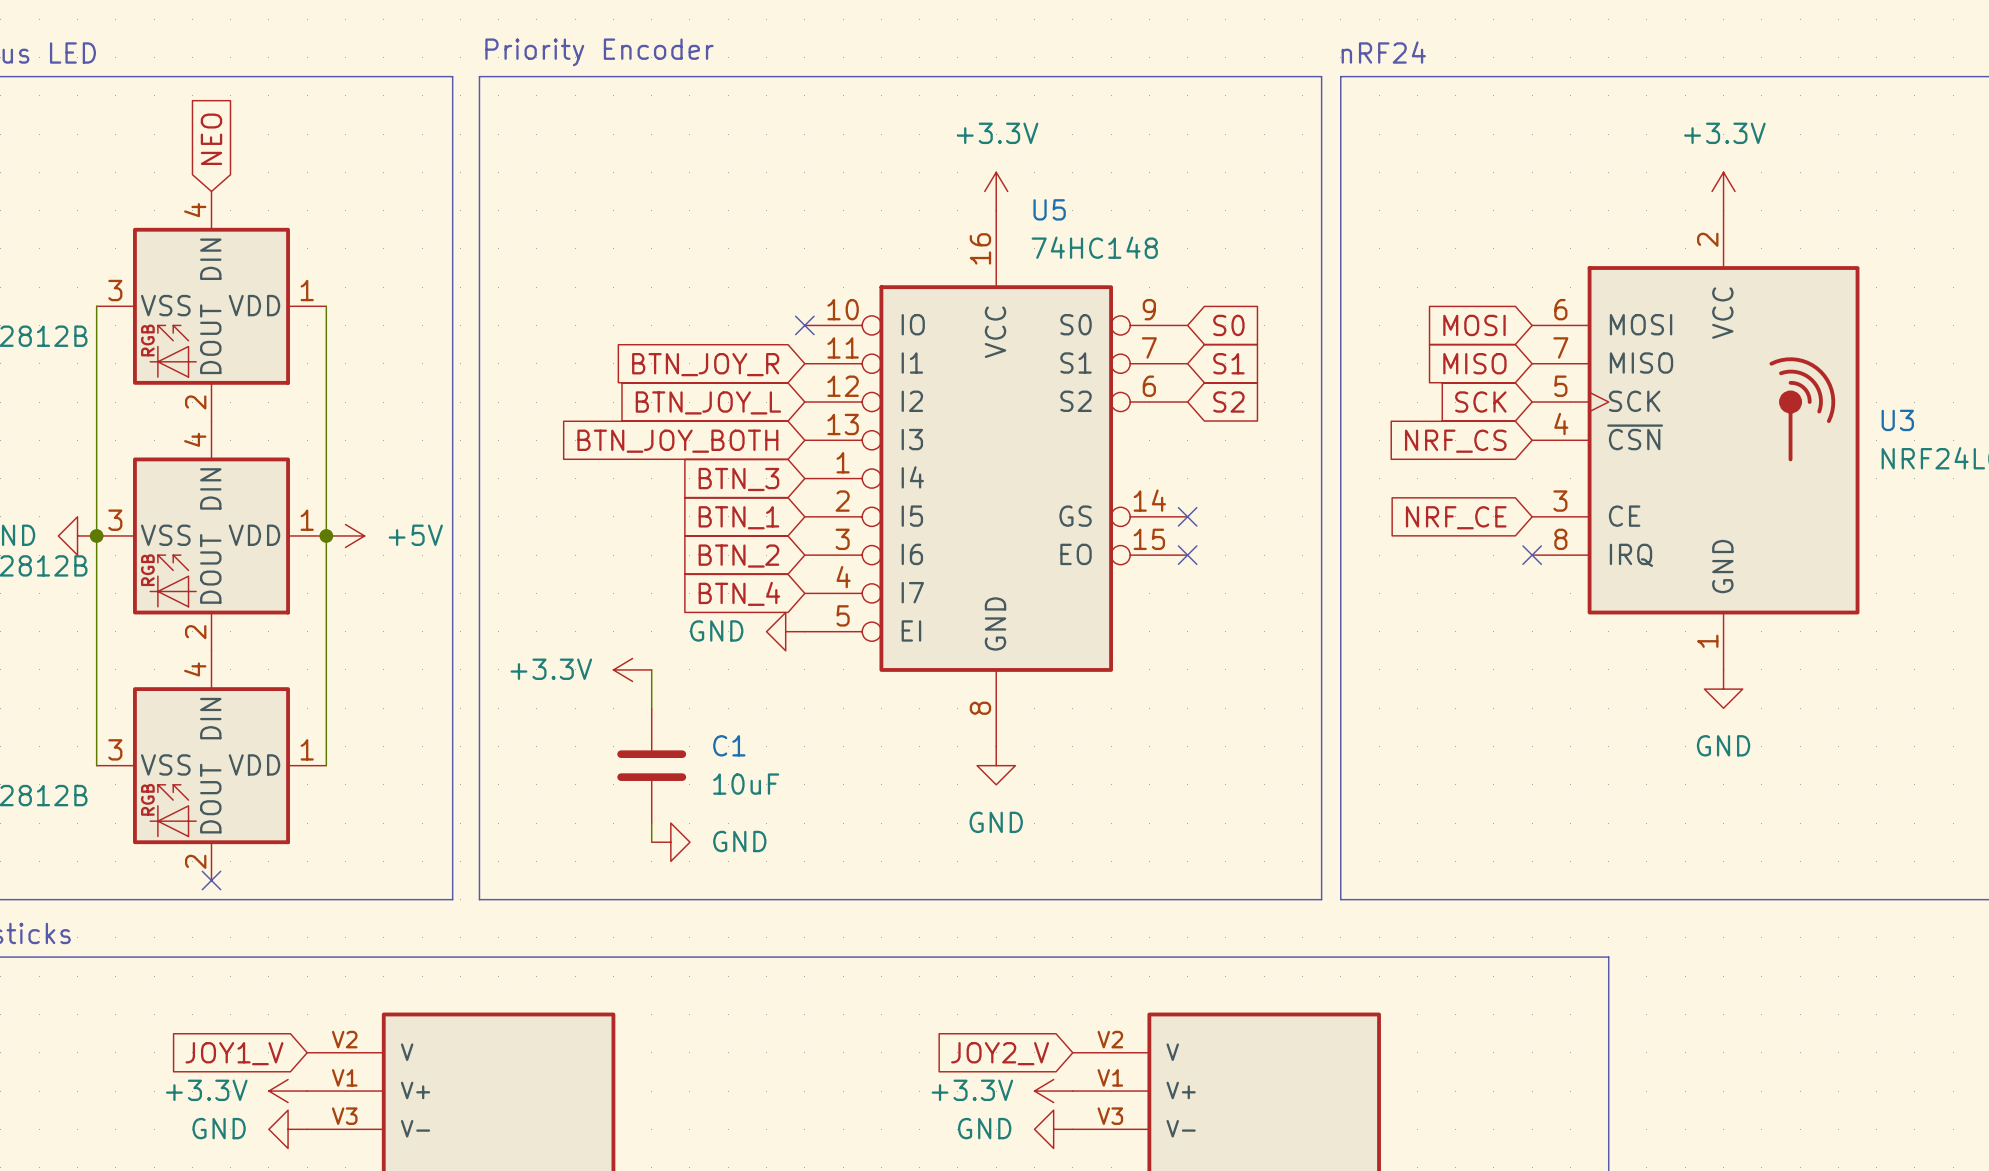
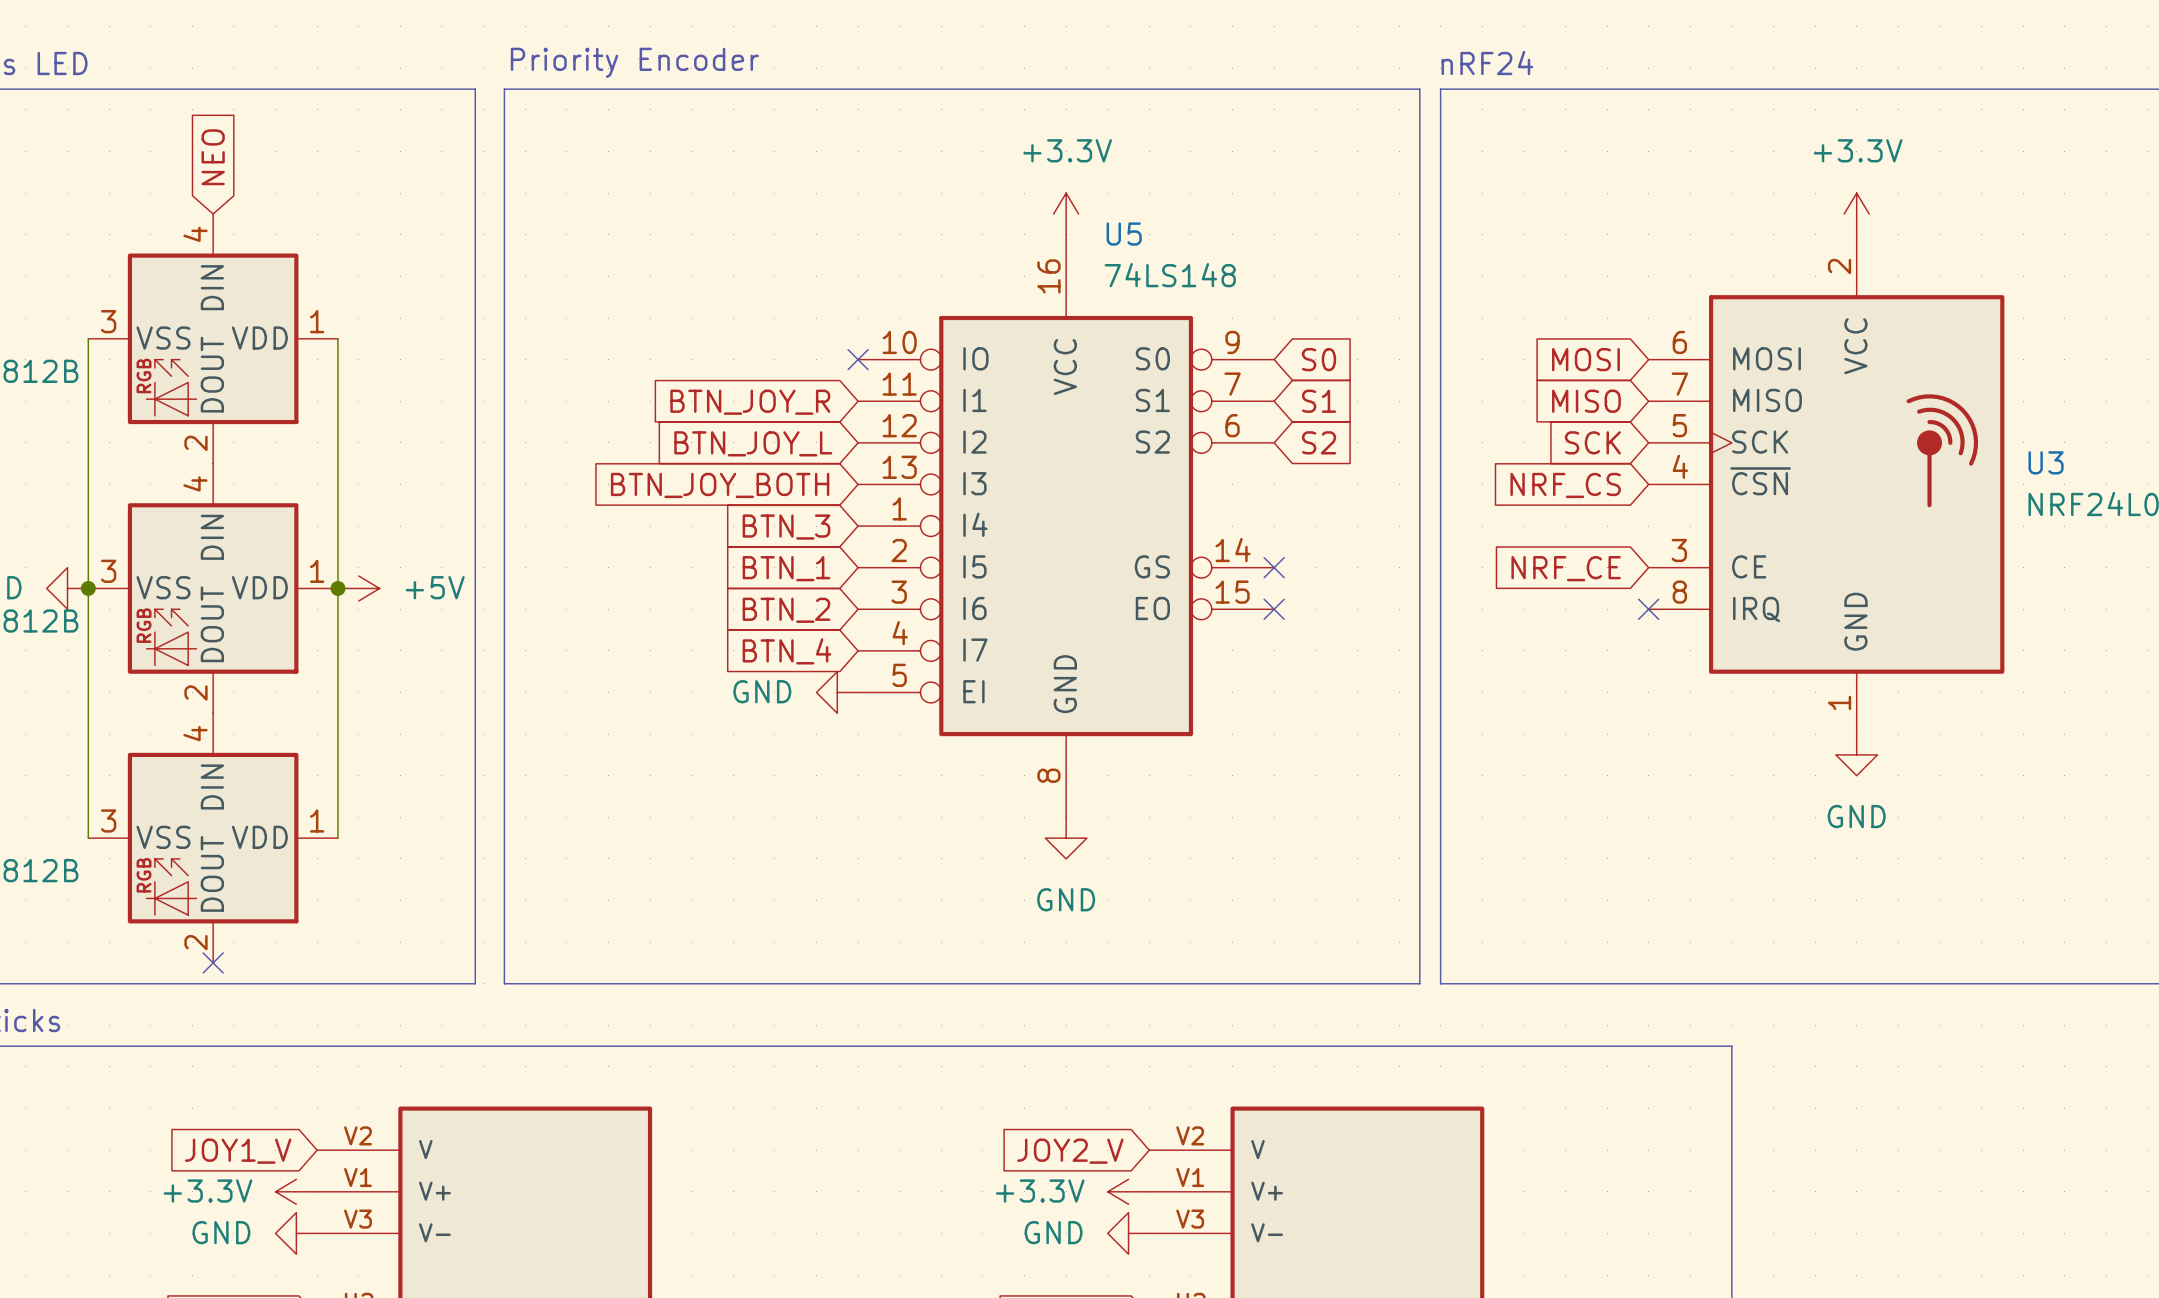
U5 value: 74HC148 (1094, 247) -> 74LS148 (1170, 275)
power symbol: +3.3V (632, 669) -> none
wire: (651, 669) (651, 708) -> none
C1: 10uF (651, 765) -> none
wire: (651, 823) (651, 842) -> none
power symbol: GND (670, 842) -> none

